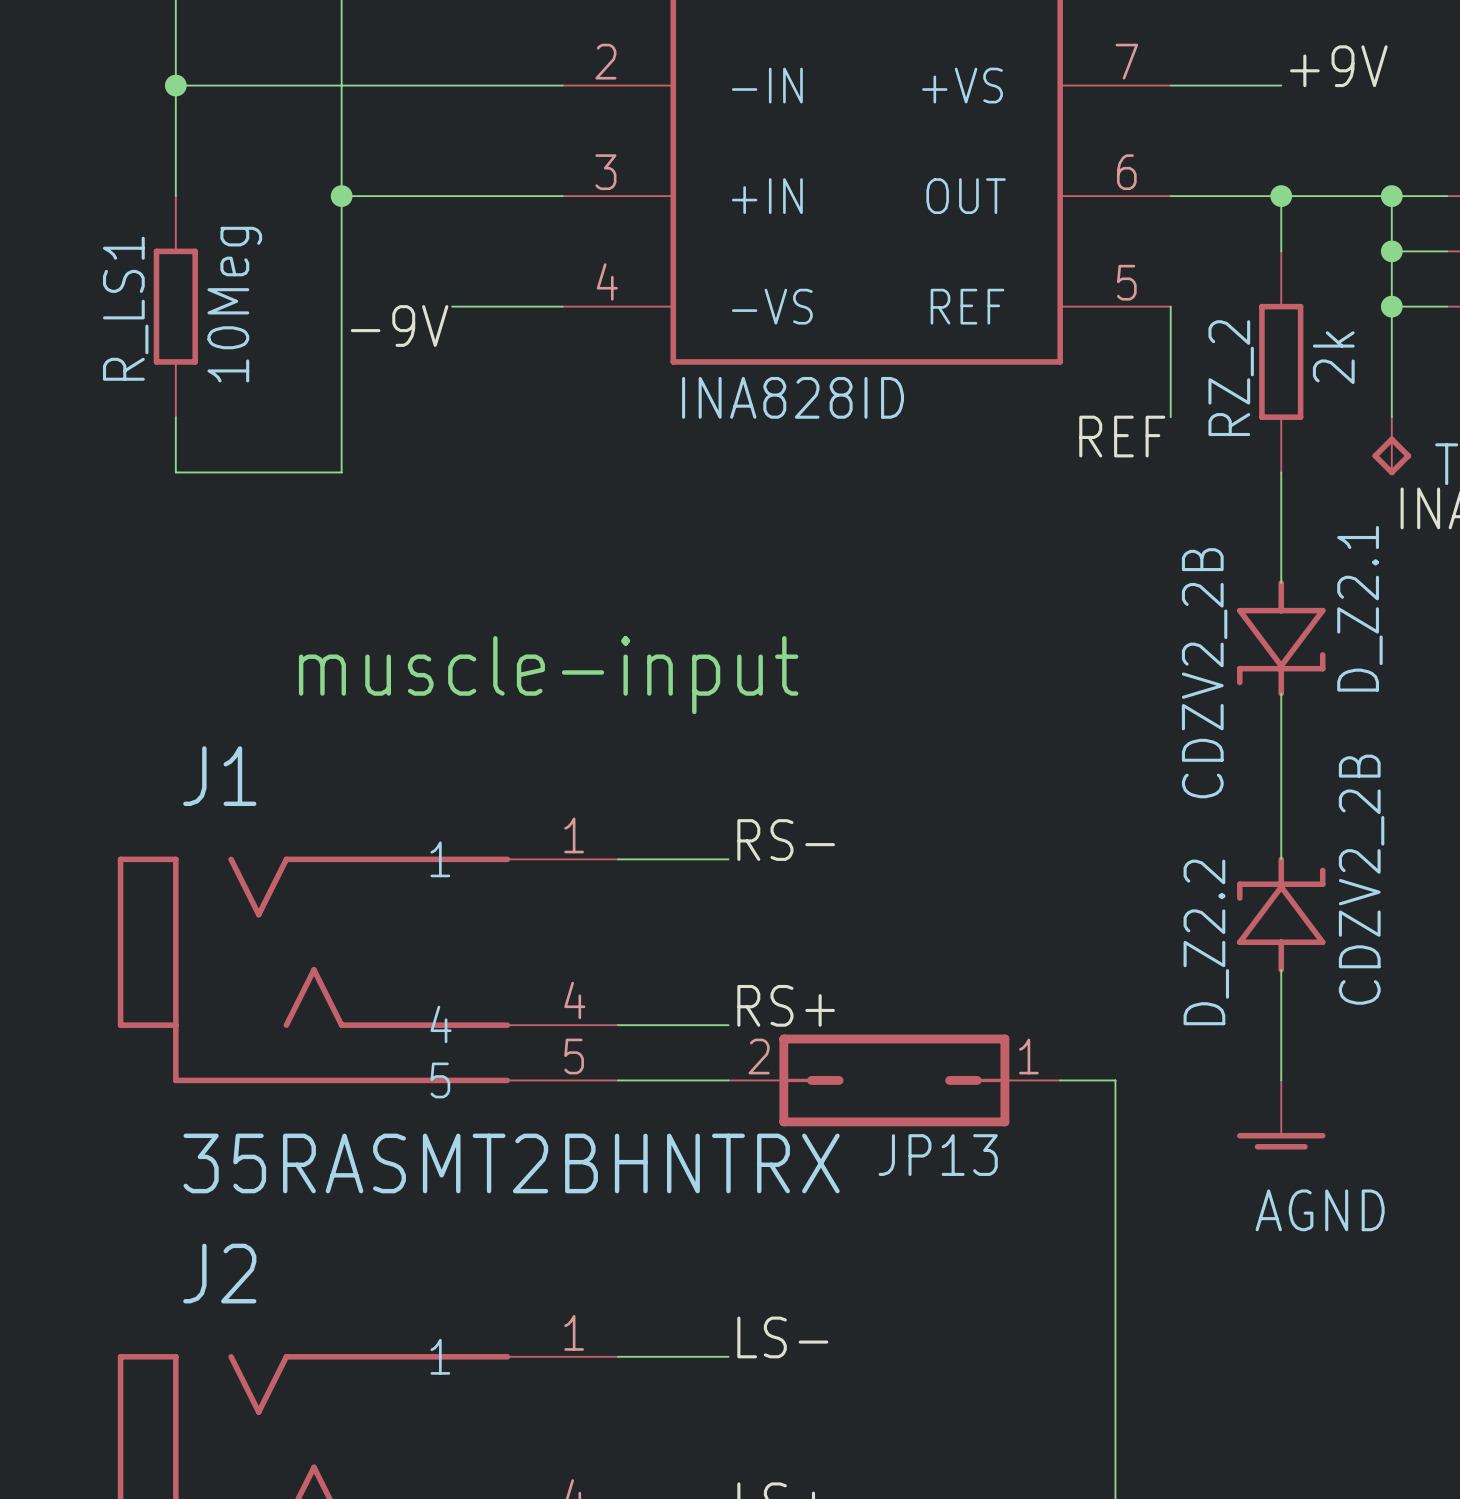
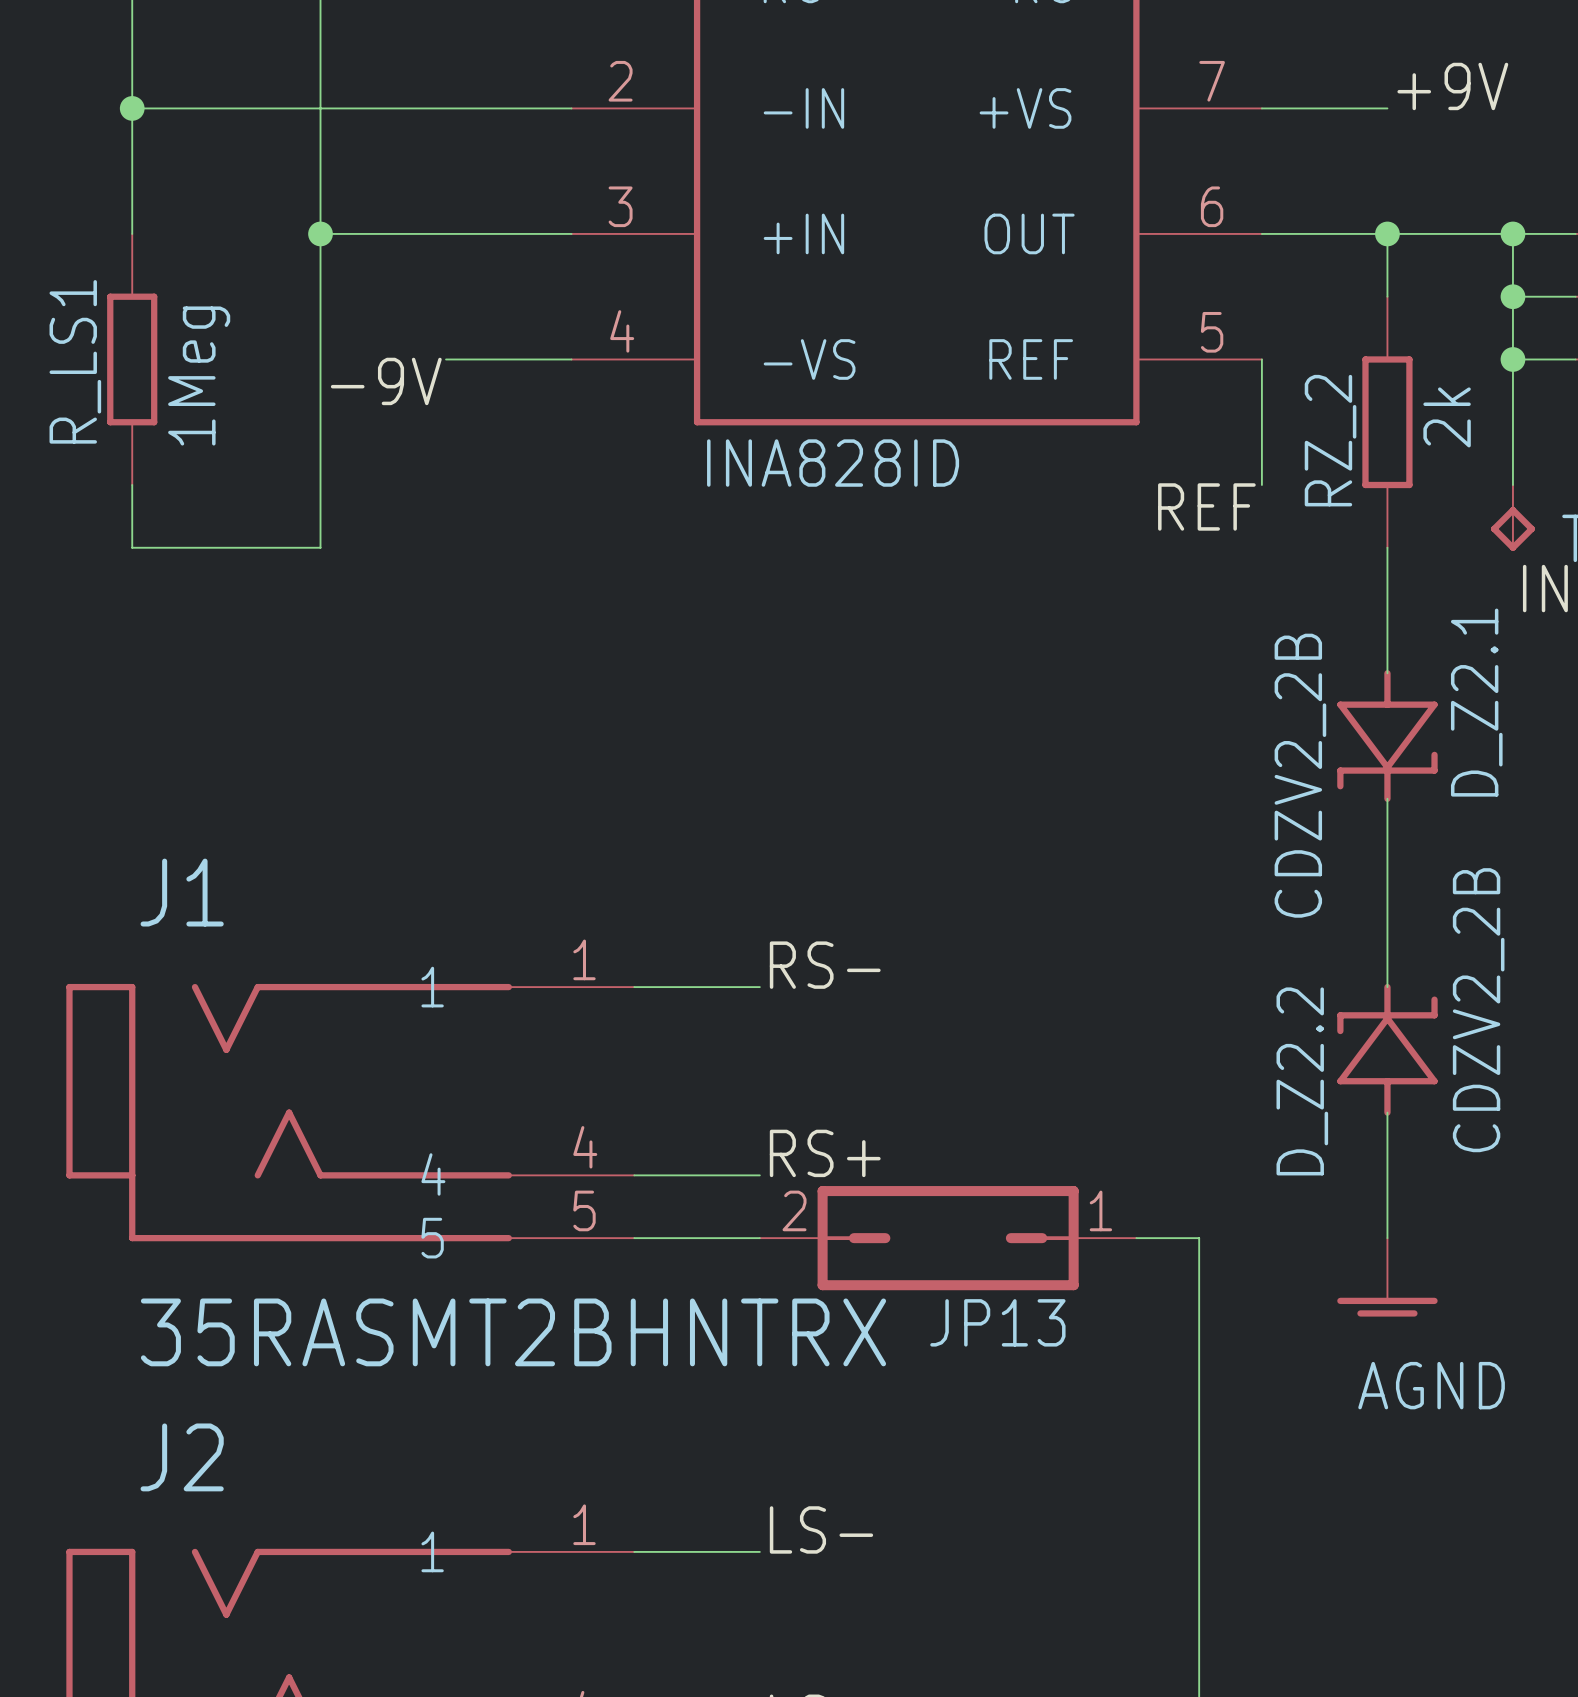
R_LS1 value: 10Meg (234, 304) -> 1Meg (199, 375)
text: muscle-input (548, 675) -> none

